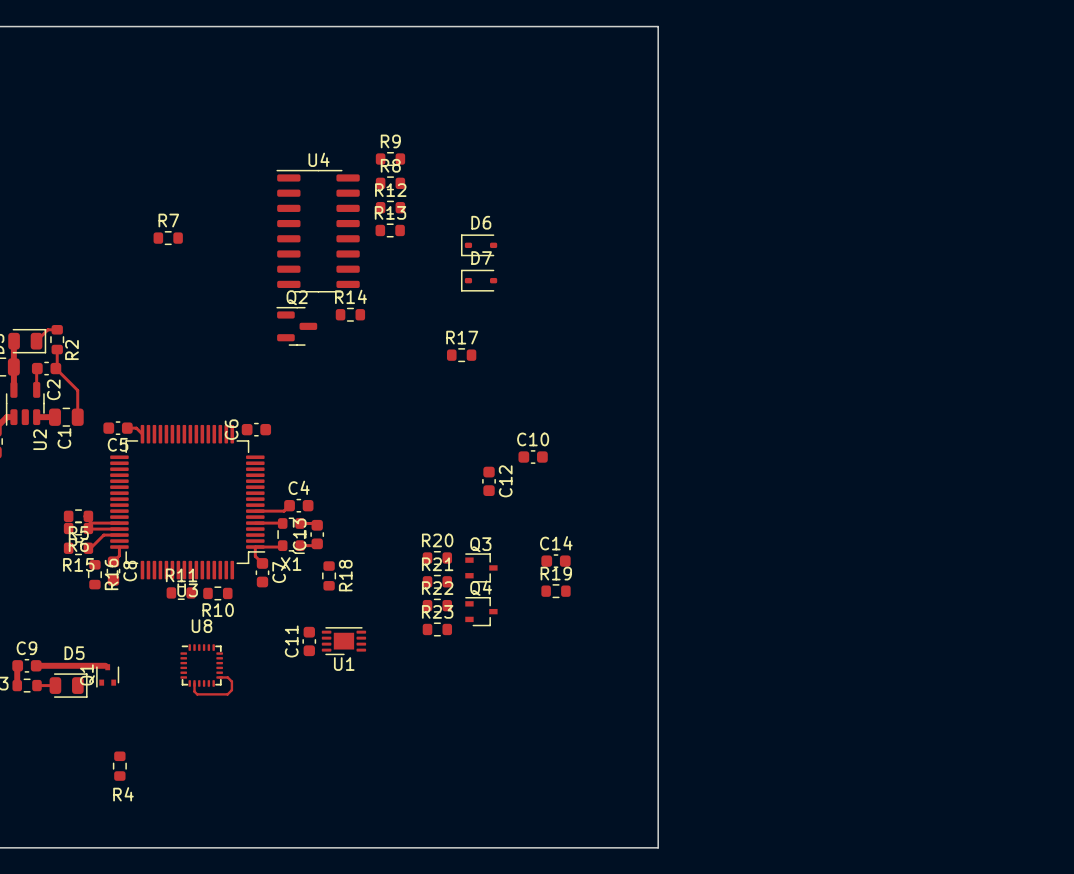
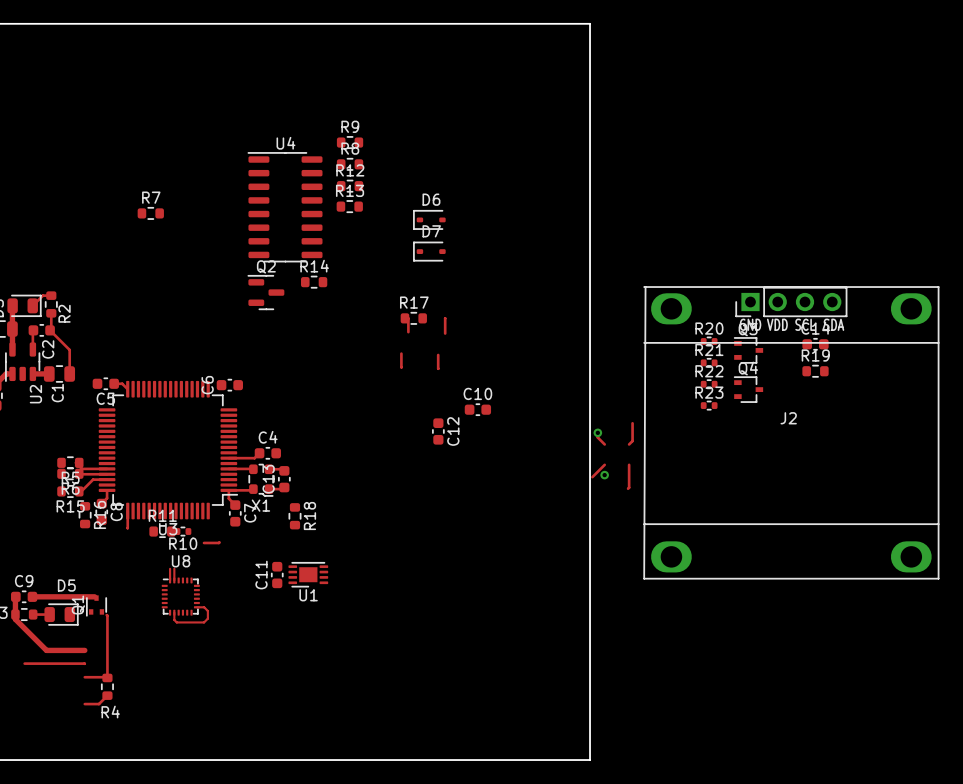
track: none -> (408, 318) (408, 332)
track: none -> (445, 318) (445, 333)
track: none -> (401, 353) (401, 367)
track: none -> (438, 354) (438, 368)
track: none -> (632, 423) (632, 441) (629, 444)
track: none -> (597, 432) (597, 437) (604, 444)
via: none -> (597, 432)
J2: none -> (791, 432)
track: none -> (604, 464) (592, 477)
track: none -> (629, 464) (628, 488)
via: none -> (604, 475)
R20 footprint: [422, 551, 453, 565] -> [700, 336, 718, 347]
C14 position: (556, 561) -> (815, 344)
Q3 position: (481, 567) -> (748, 350)
track: none -> (127, 511) (127, 528)
R21 footprint: [422, 574, 453, 589] -> [700, 358, 718, 368]
R10 footprint: [203, 586, 233, 601] -> [174, 526, 192, 537]
R19 position: (556, 591) -> (815, 371)
R22 footprint: [422, 598, 453, 613] -> [700, 379, 718, 389]
track: none -> (219, 542) (204, 542)
Q4 position: (481, 611) -> (748, 389)
R23 footprint: [422, 622, 453, 637] -> [700, 400, 718, 411]
track: none -> (170, 568) (170, 580)
track: none -> (174, 568) (174, 580)
track: none -> (15, 614) (15, 619) (46, 650) (84, 650)
track: none -> (106, 615) (107, 677) (84, 677)
track: none -> (24, 663) (84, 663)
track: none -> (107, 695) (99, 704) (84, 704)

